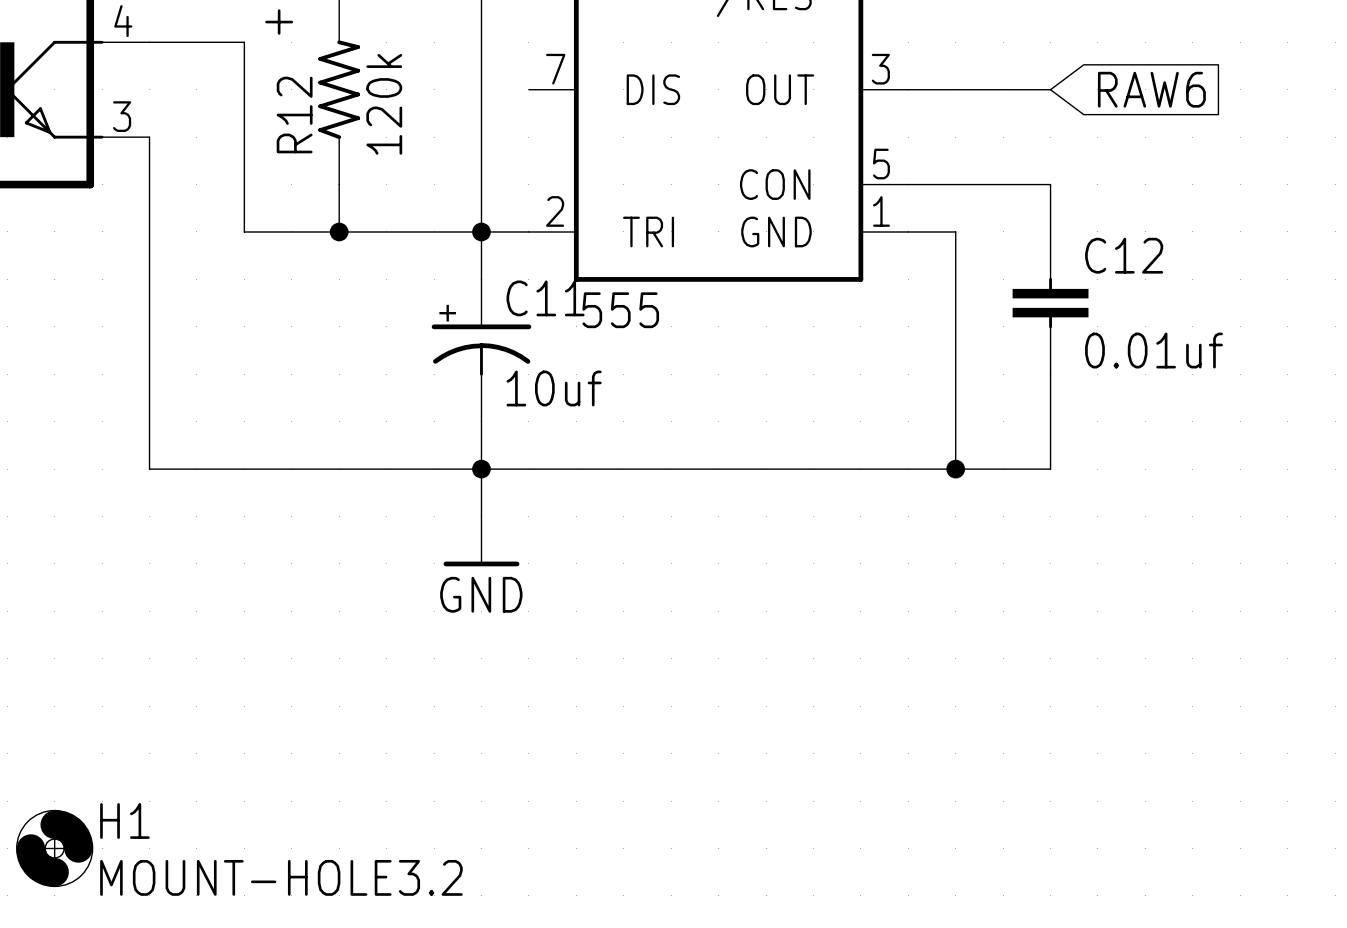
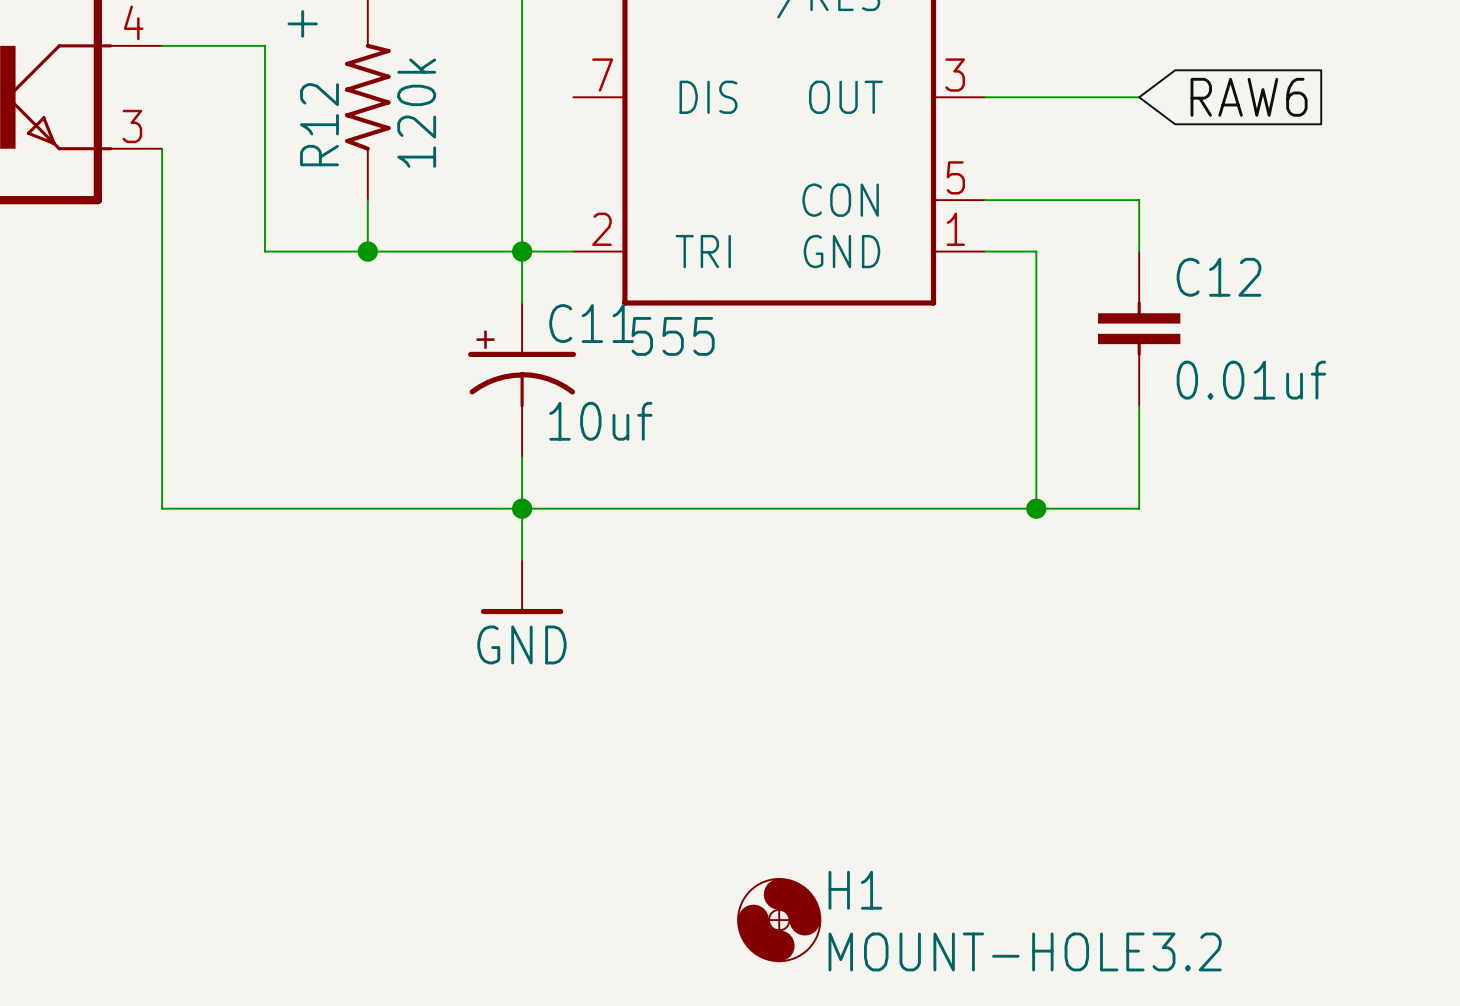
H1 position: (54, 848) -> (779, 920)

